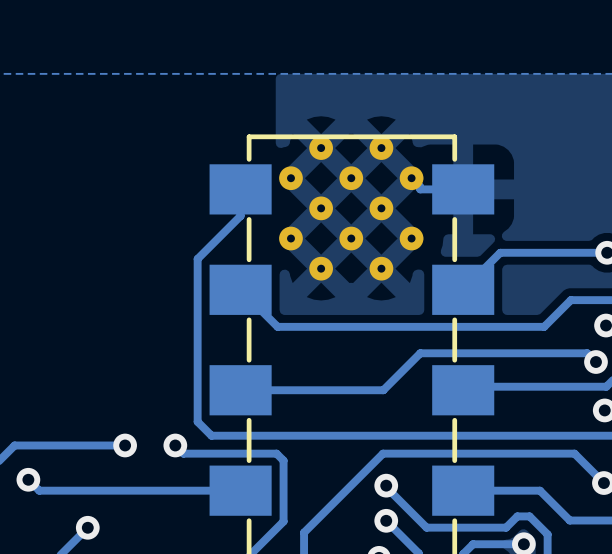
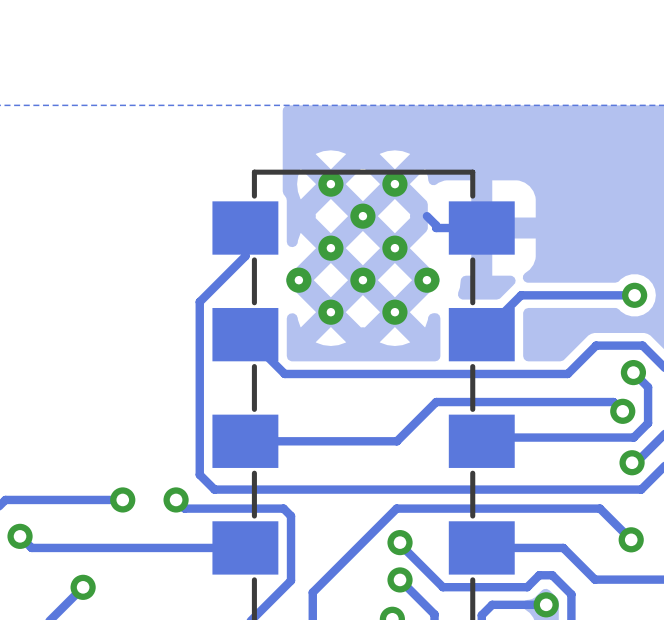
part footprint: [279, 136, 424, 281] -> [286, 171, 440, 325]

